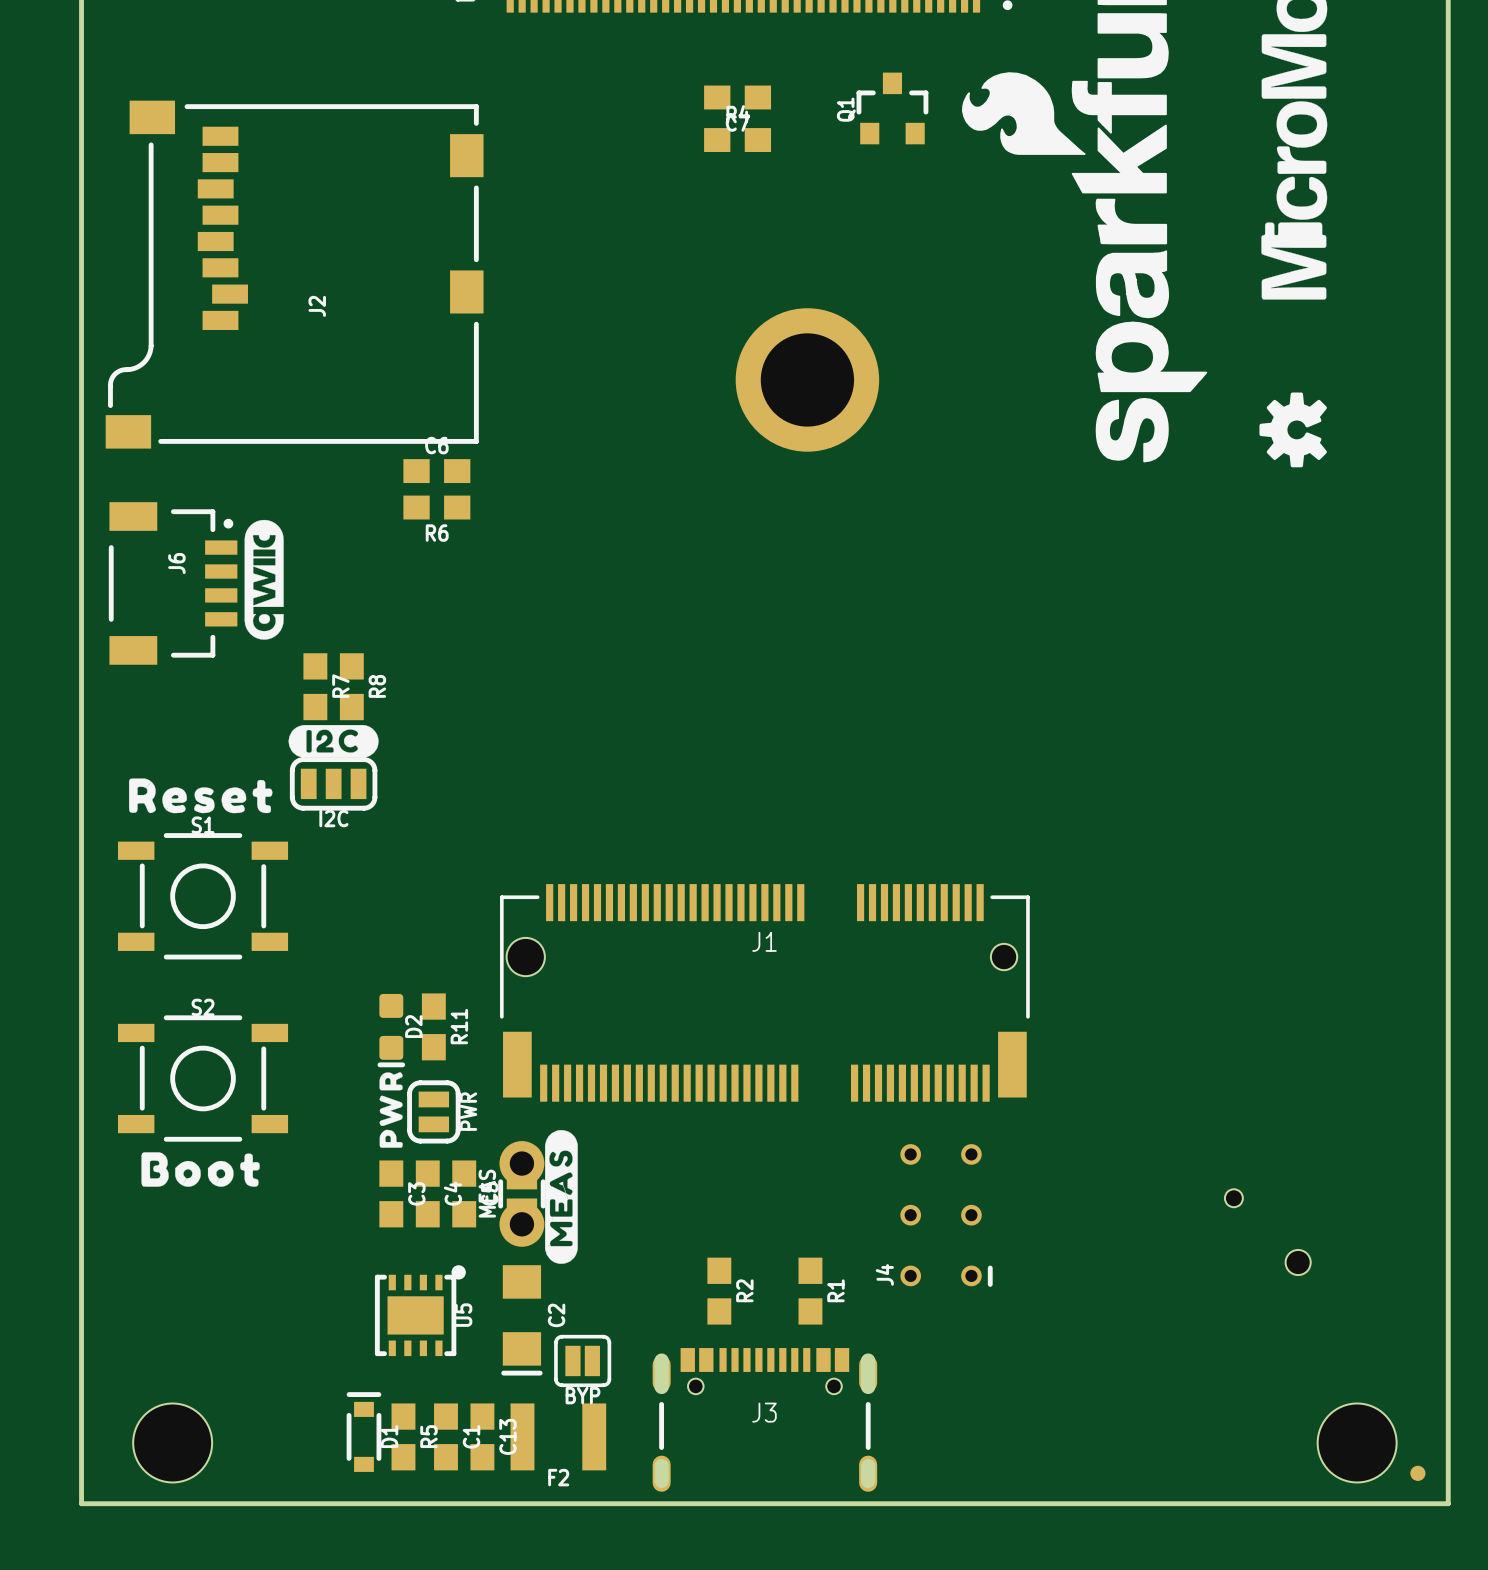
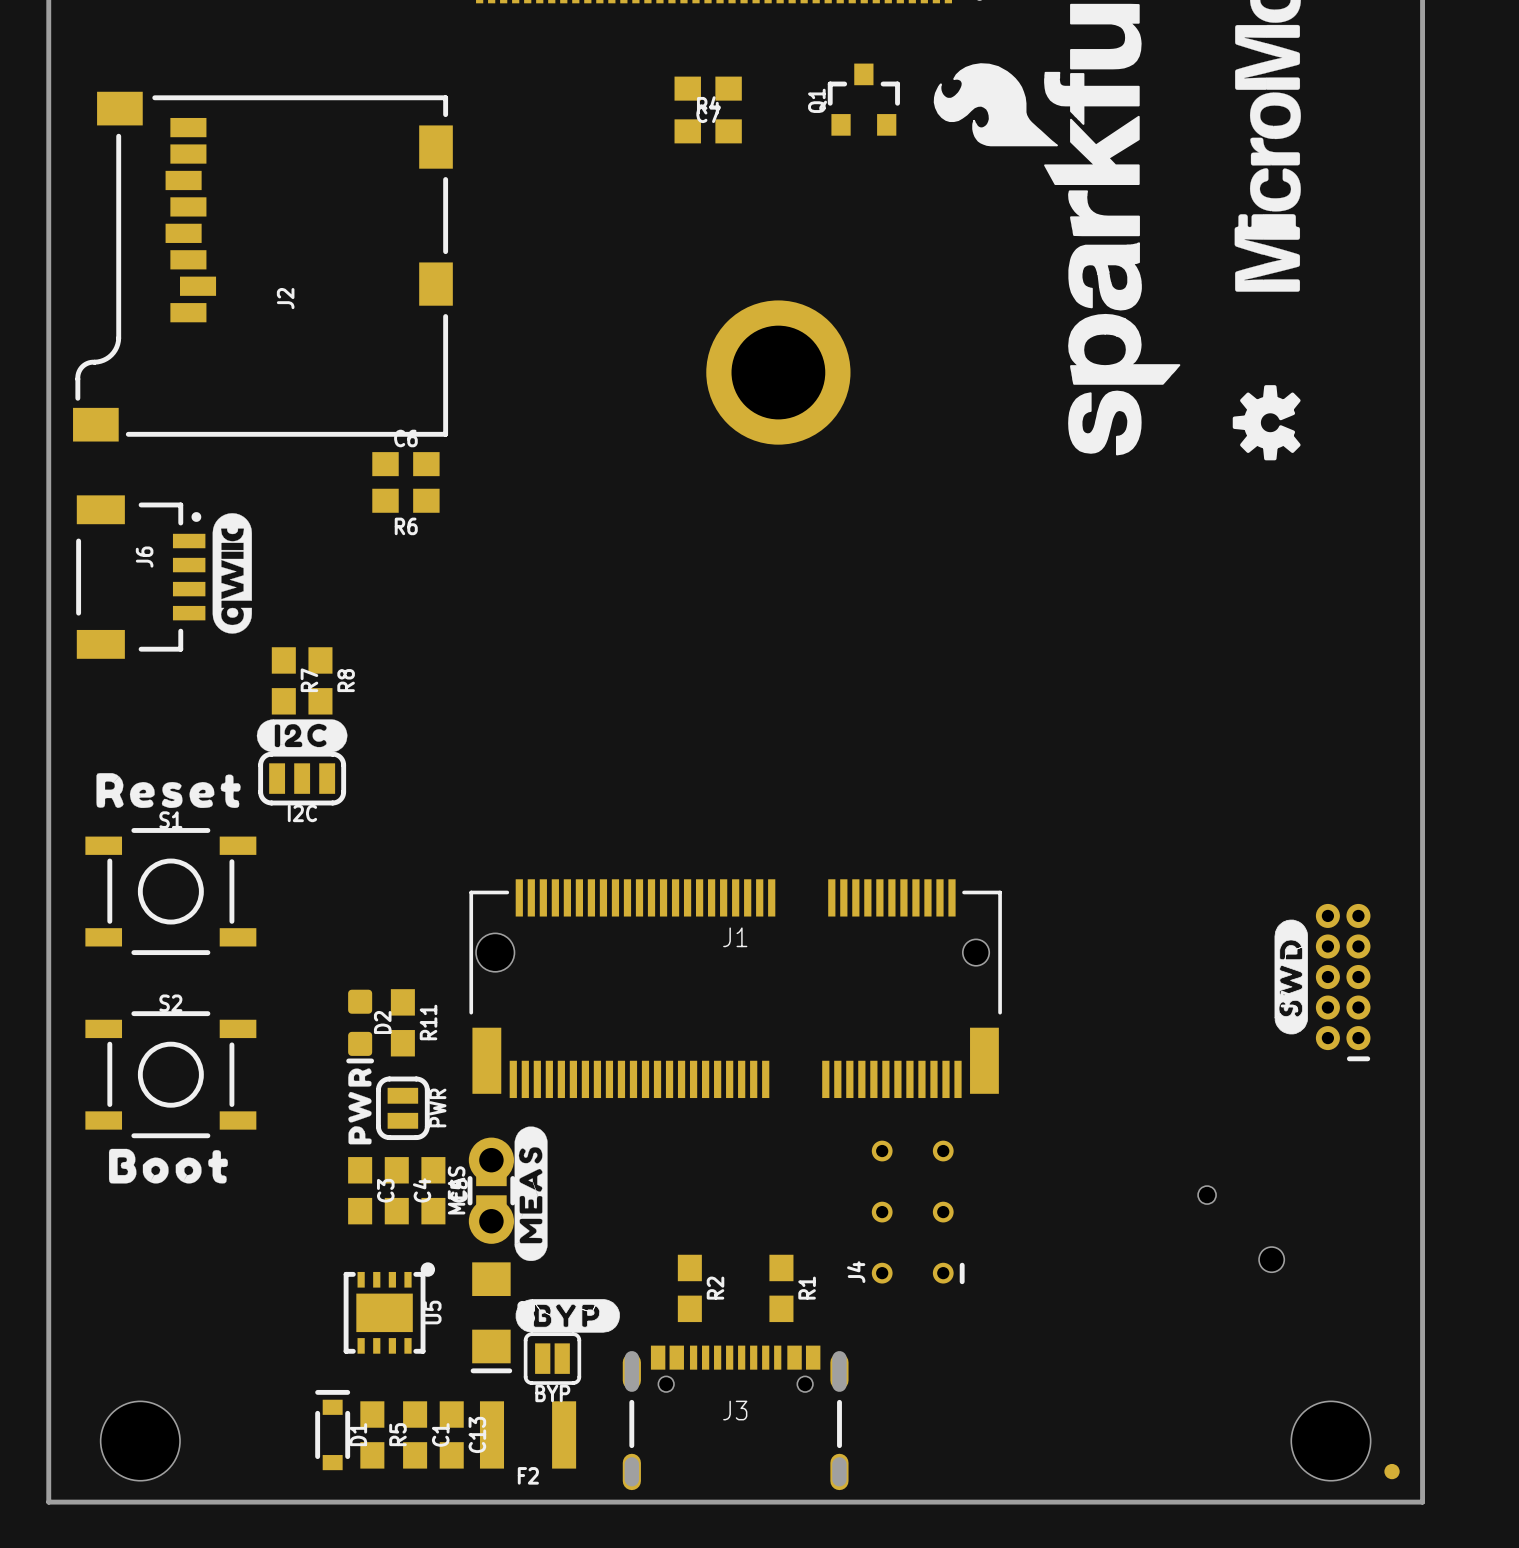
drawing: none -> [1274, 919, 1308, 1035]
part: none -> (1343, 982)
drawing: none -> [515, 1299, 620, 1333]

